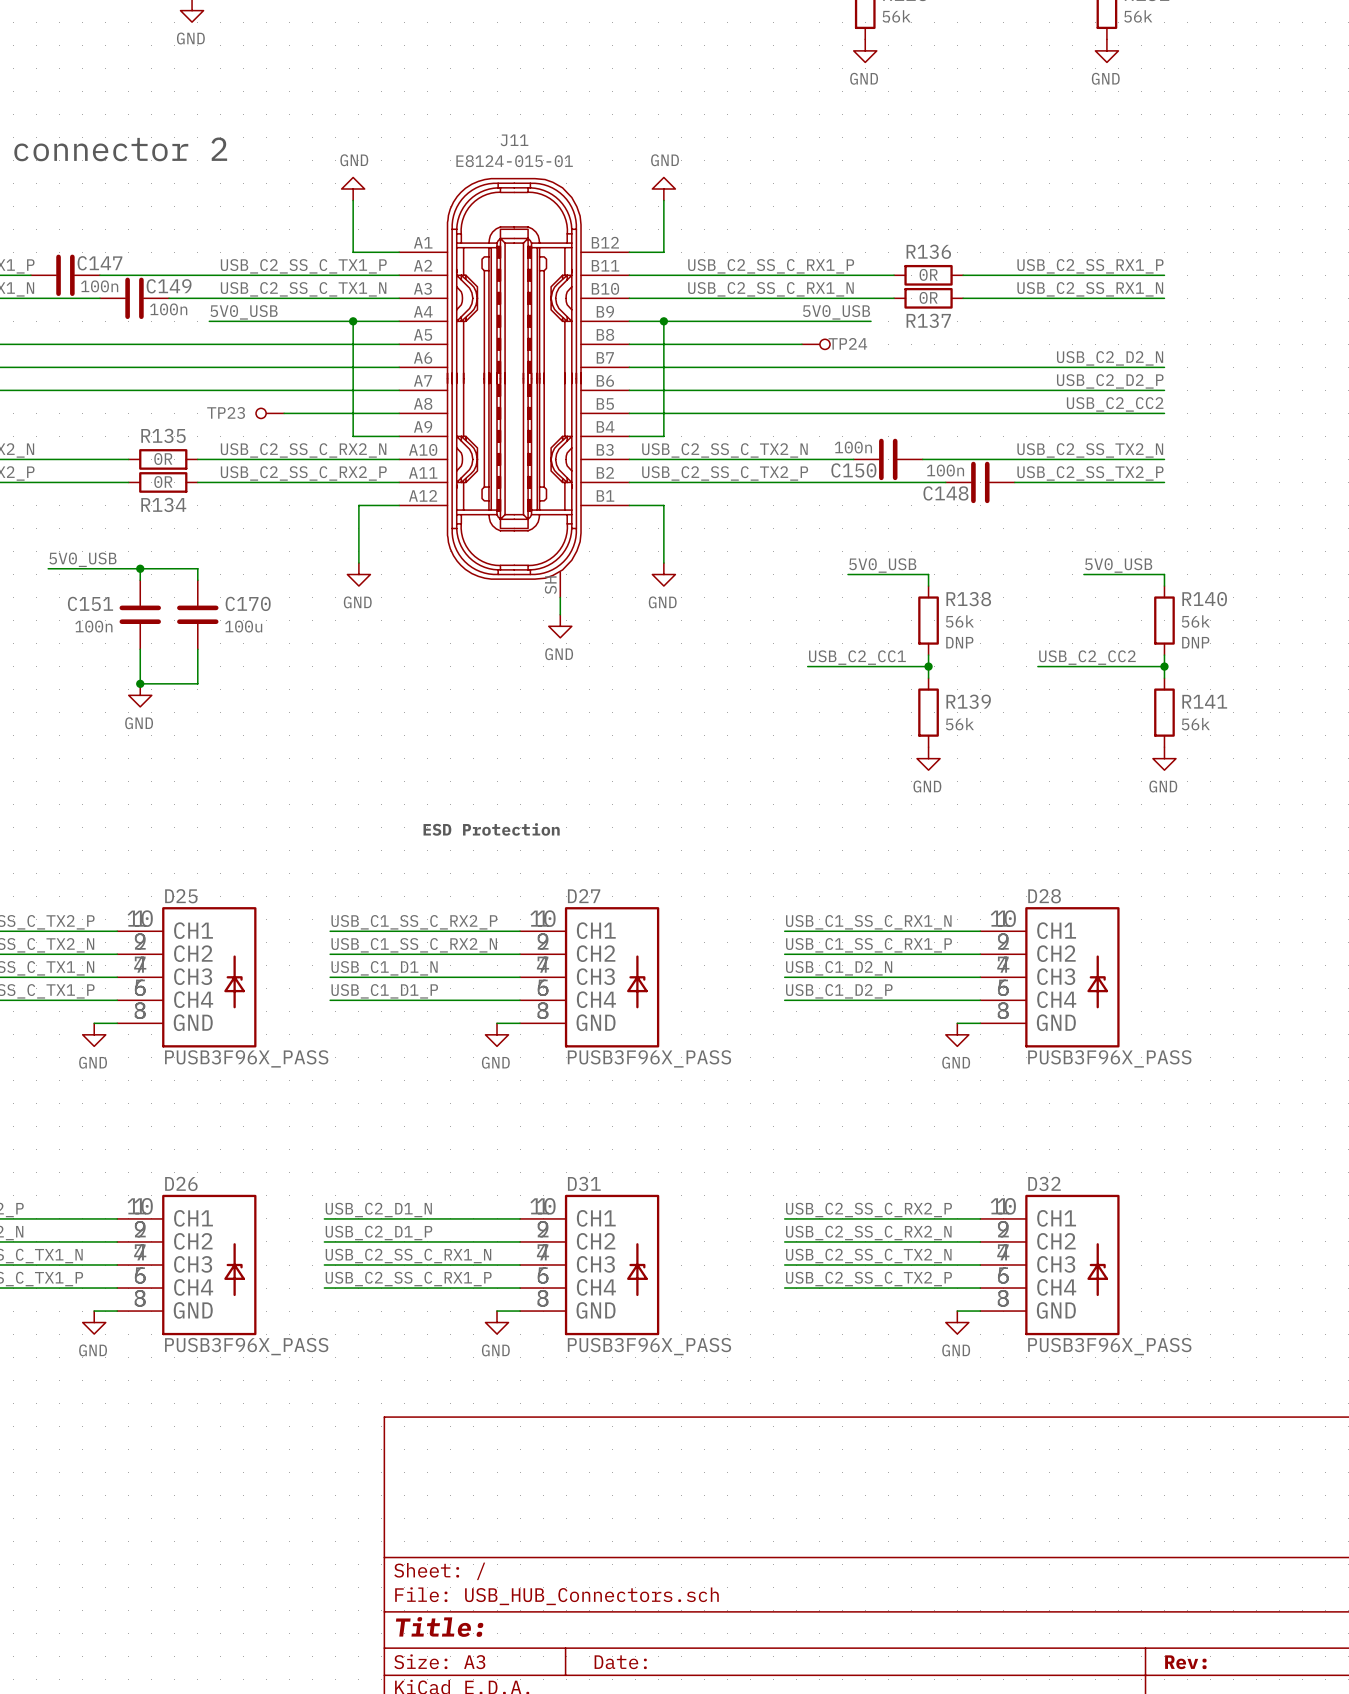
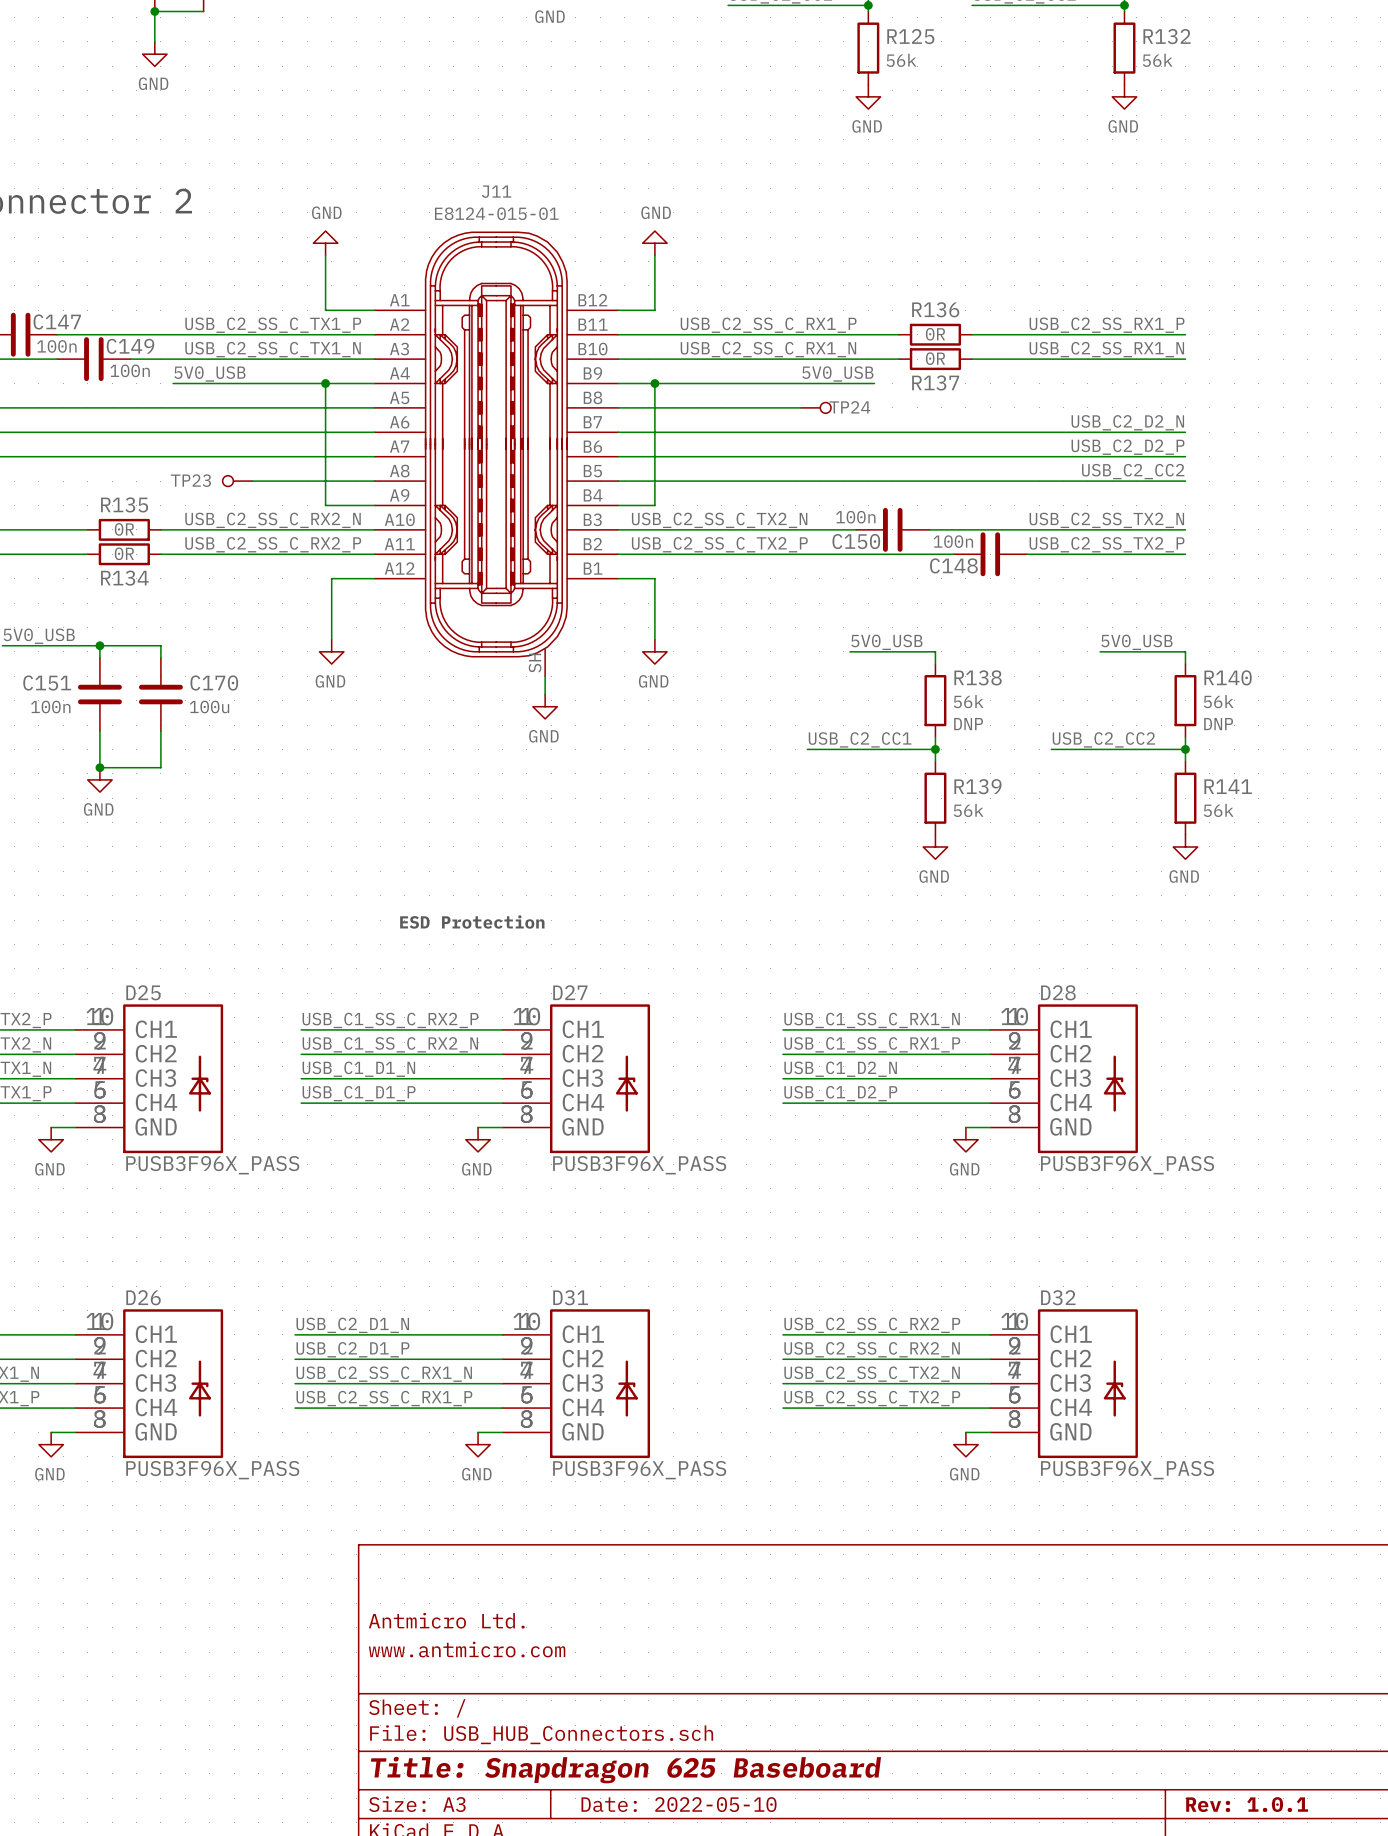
title block: none -> Antmicro Ltd. (446, 1620)
title block: none -> www.antmicro.com (467, 1649)
title block: Title: (439, 1626) -> Title: Snapdragon 625 Baseboard (625, 1770)
title block: Date: (620, 1662) -> Date: 2022-05-10 (679, 1804)
title block: Rev: (1185, 1662) -> Rev: 1.0.1 (1247, 1804)

